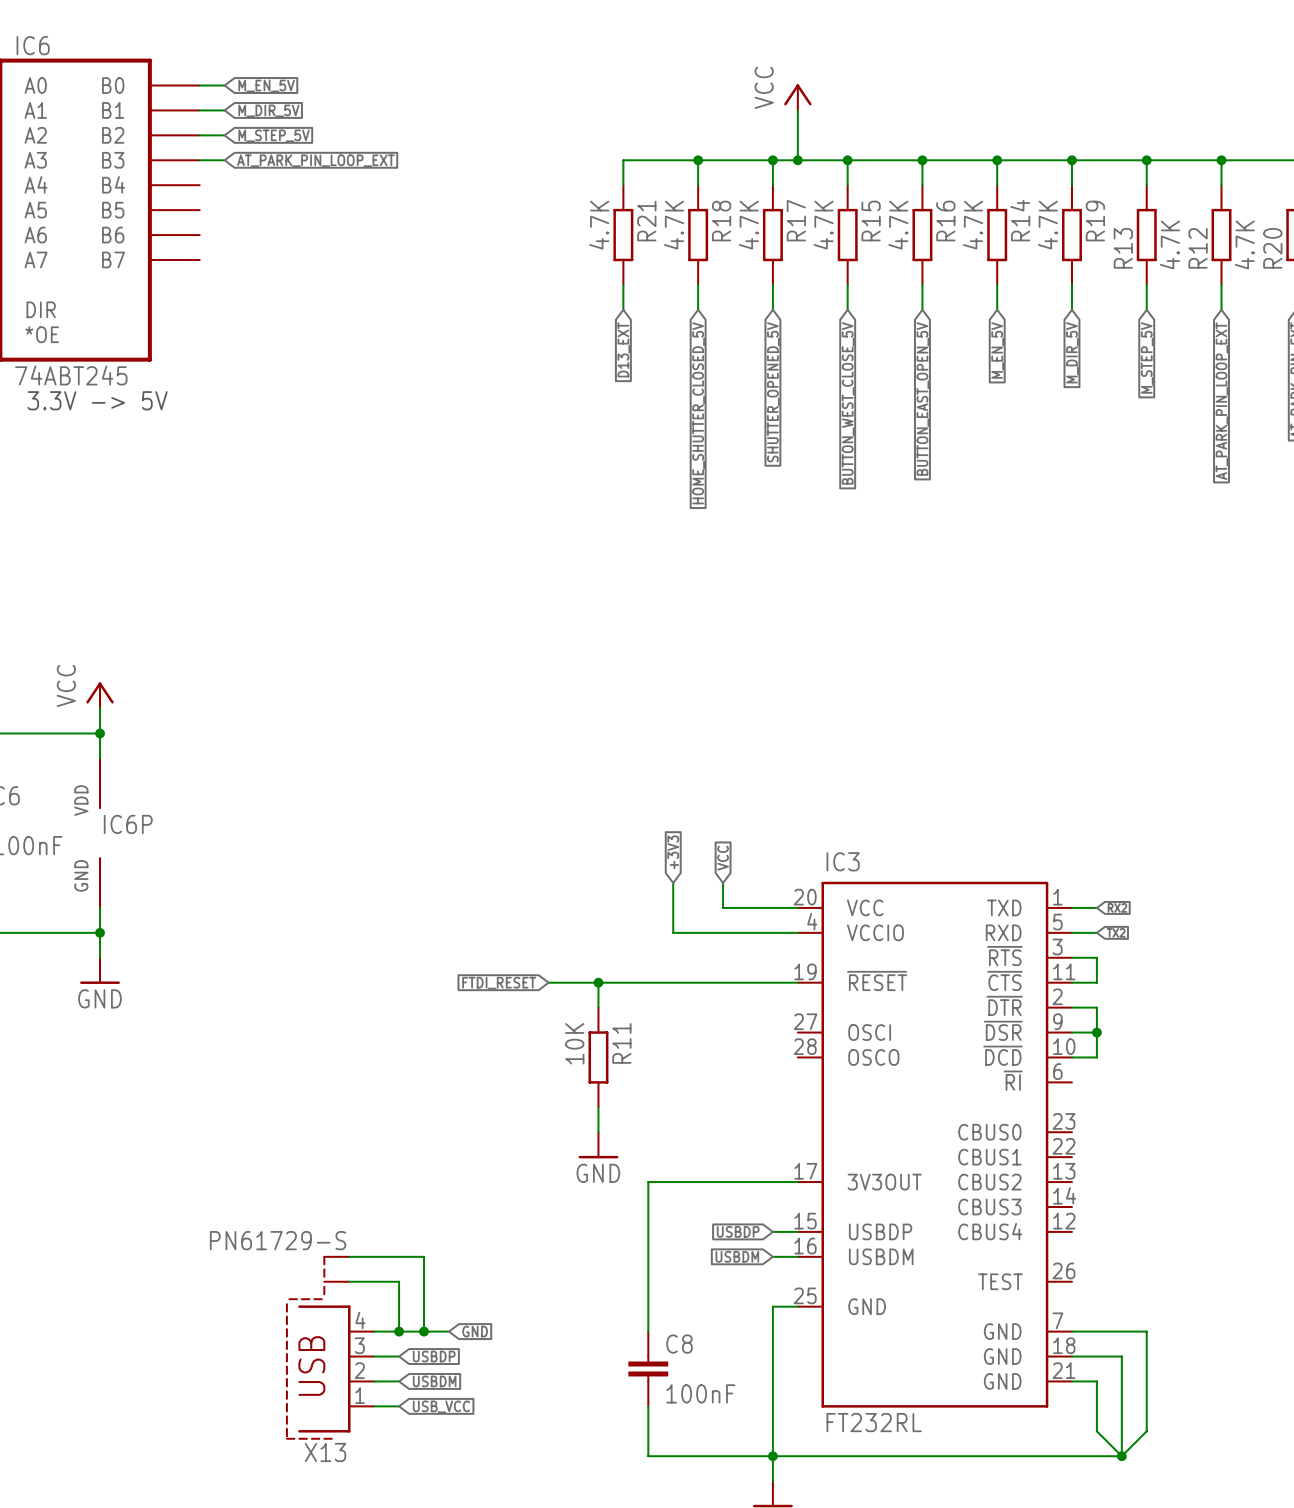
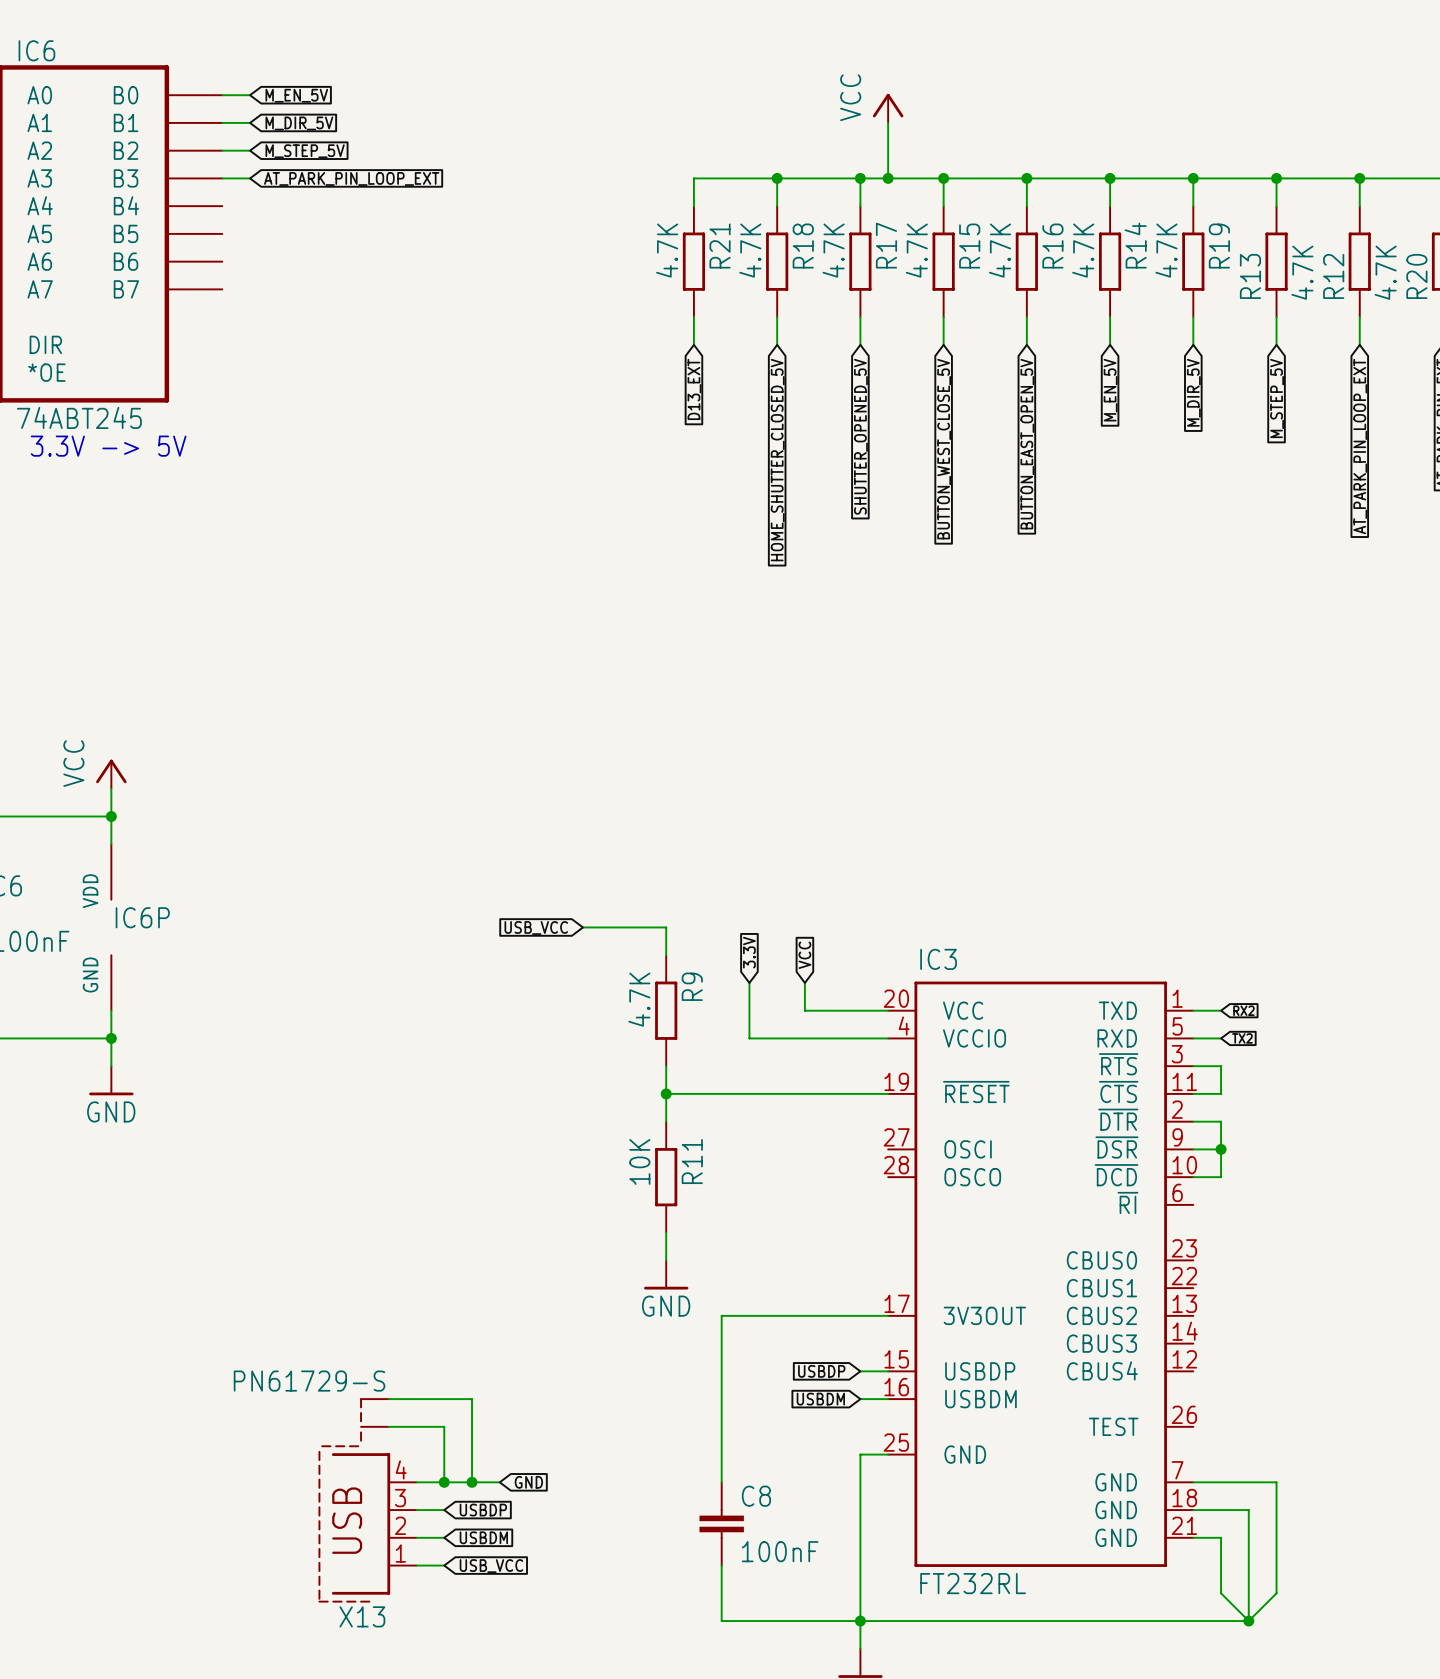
global label: none -> USB_VCC (536, 928)
wire: none -> (582, 927) (666, 927) (666, 955)
global label: +3V3 (673, 852) -> 3.3V (749, 952)
R9: none -> 4.7K (666, 1010)
wire: (548, 982) (598, 982) -> (666, 1066) (666, 1093)
global label: FTDI_RESET (499, 983) -> none

